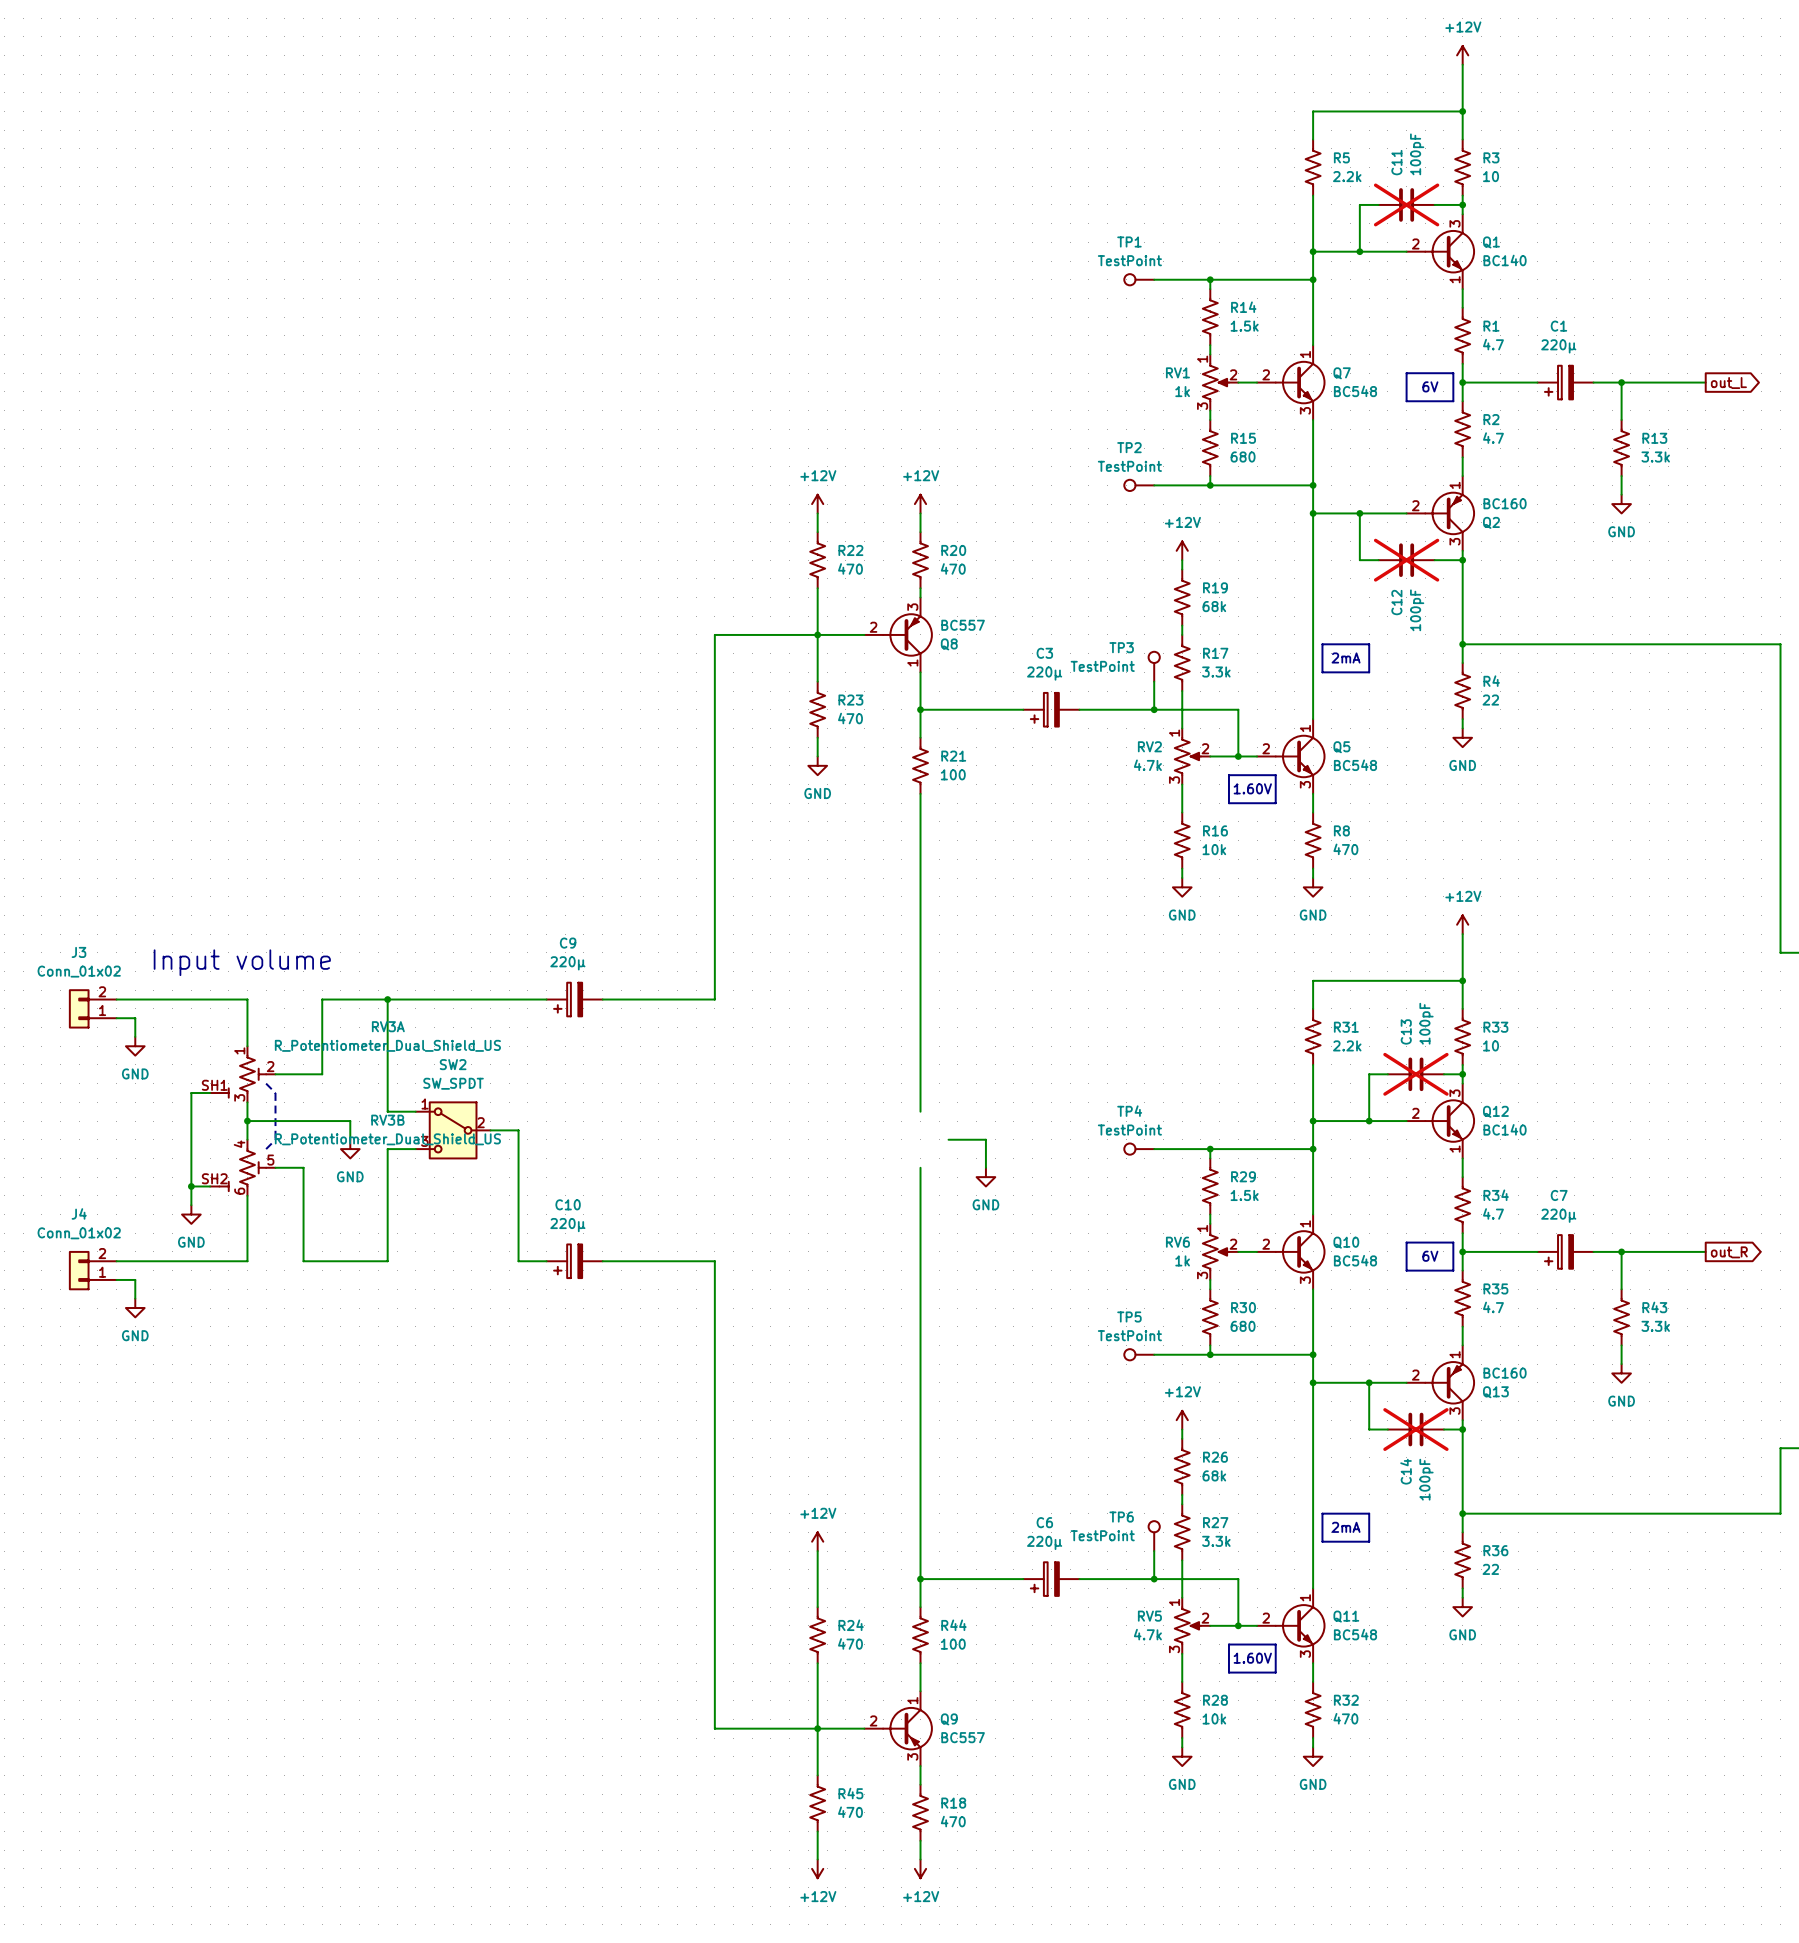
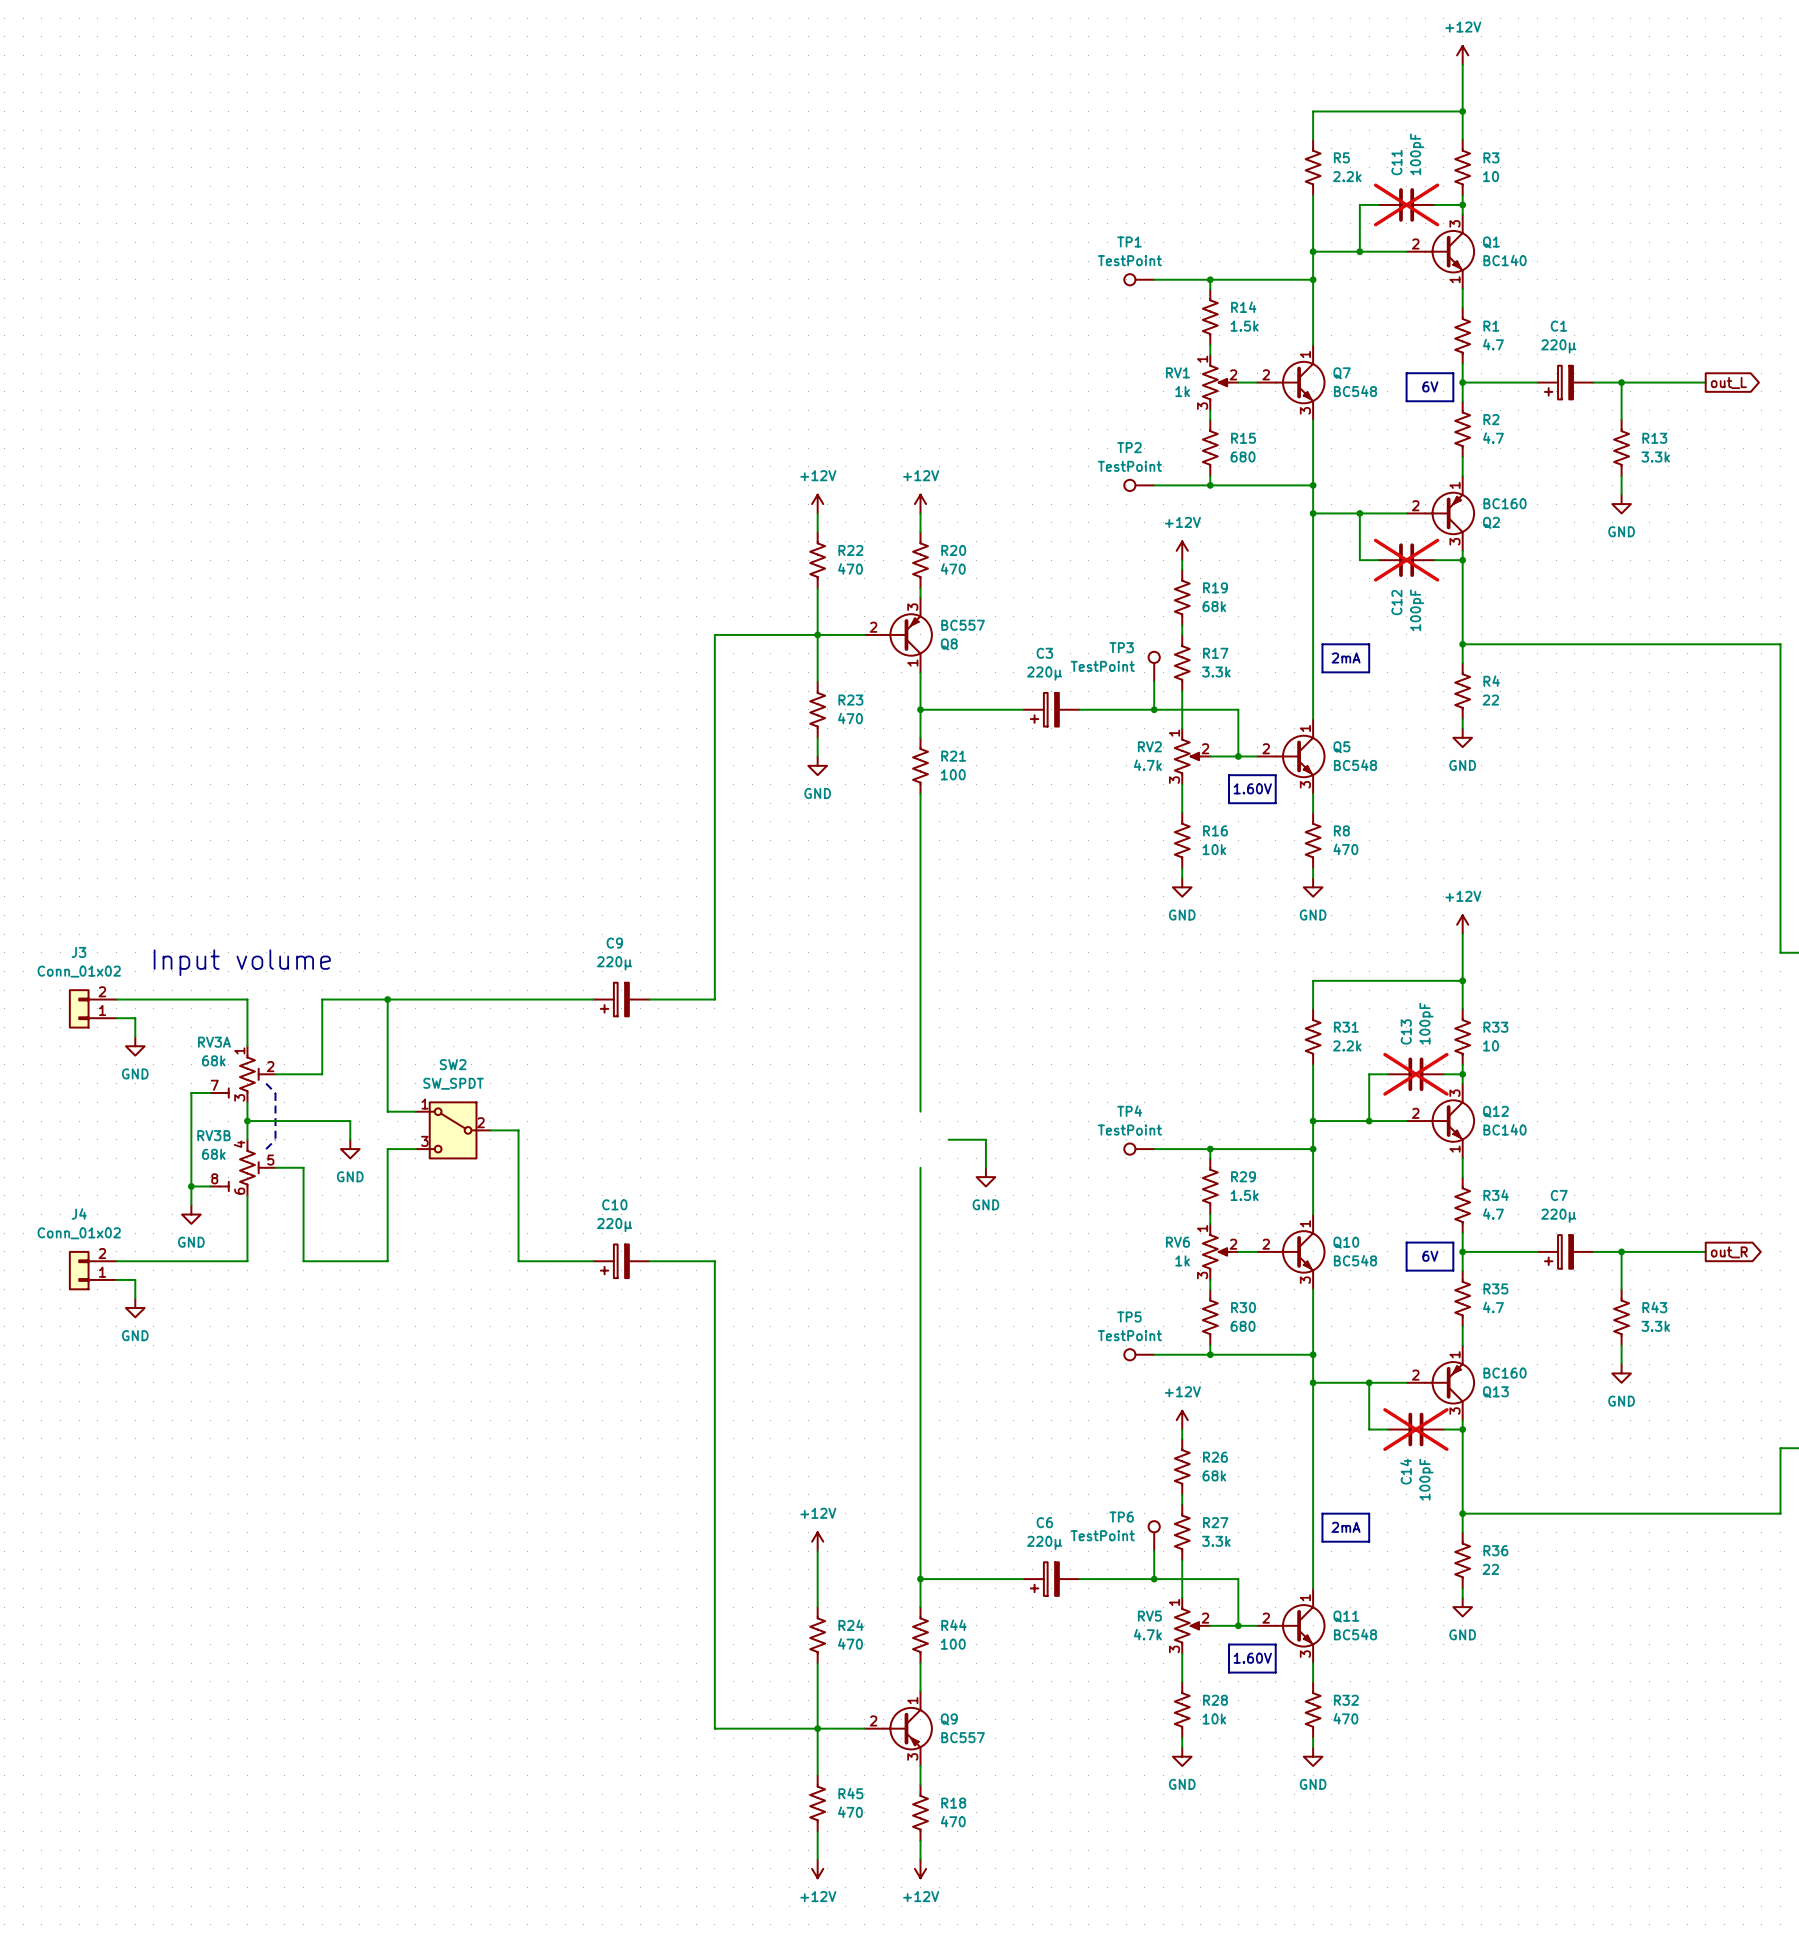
C9 position: (574, 999) -> (621, 999)
RV3A name position: RV3A (388, 1026) -> RV3A (214, 1042)
RV3A value: R_Potentiometer_Dual_Shield_US (387, 1045) -> 68k (213, 1060)
RV3A pin number: SH1 (214, 1085) -> 7 (214, 1085)
RV3B name position: RV3B (387, 1120) -> RV3B (214, 1135)
RV3B value: R_Potentiometer_Dual_Shield_US (387, 1139) -> 68k (213, 1154)
RV3B pin number: SH2 (214, 1178) -> 8 (214, 1178)
C10 position: (574, 1261) -> (621, 1261)

